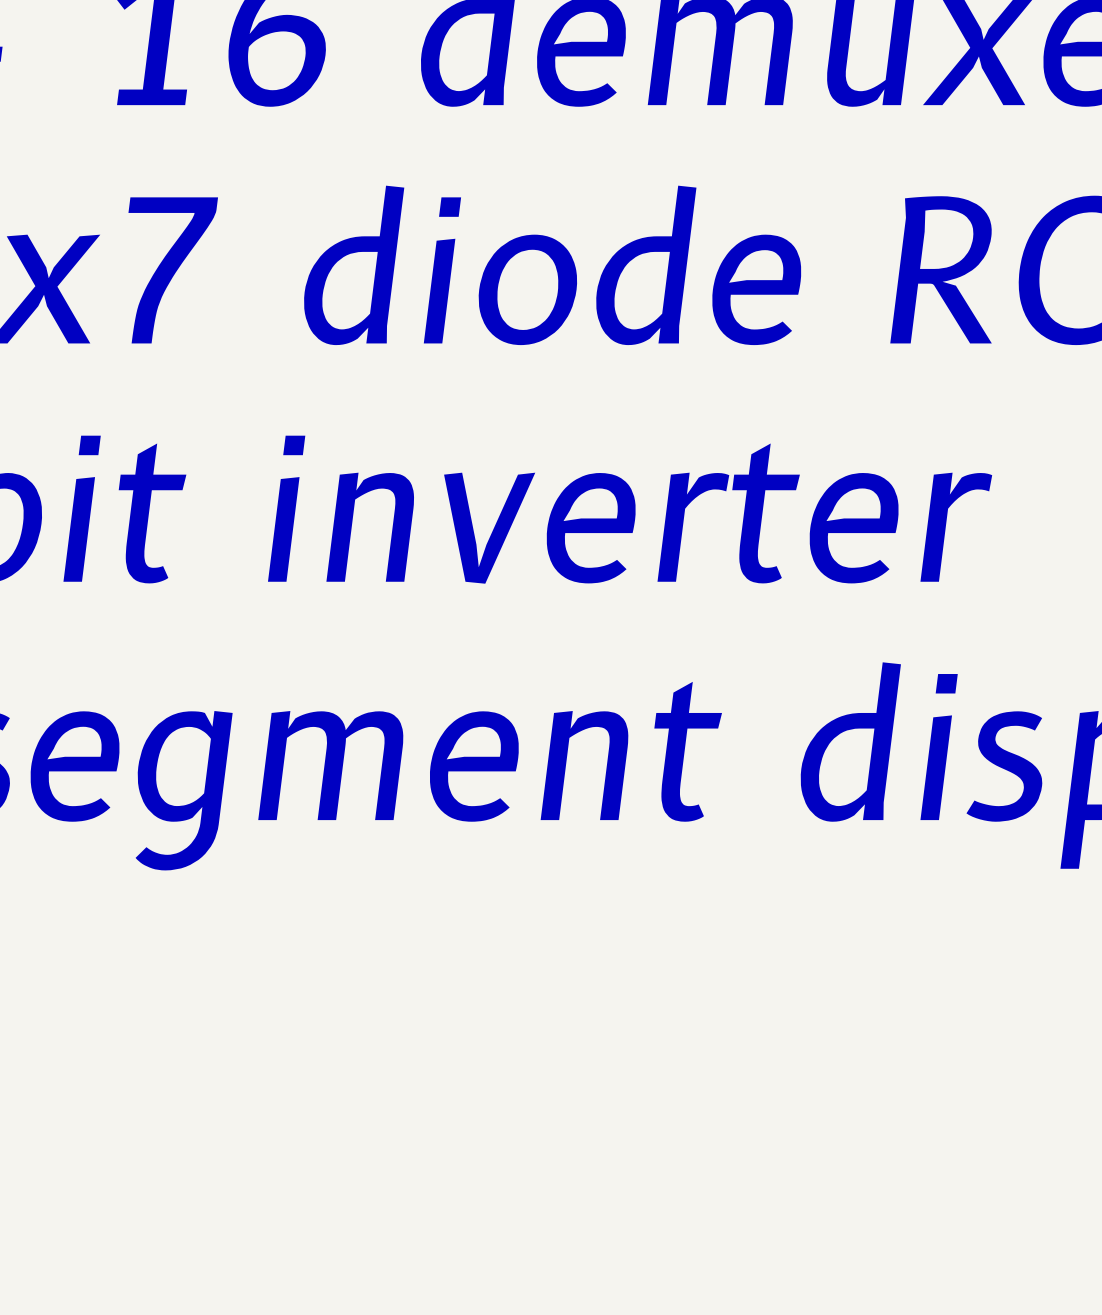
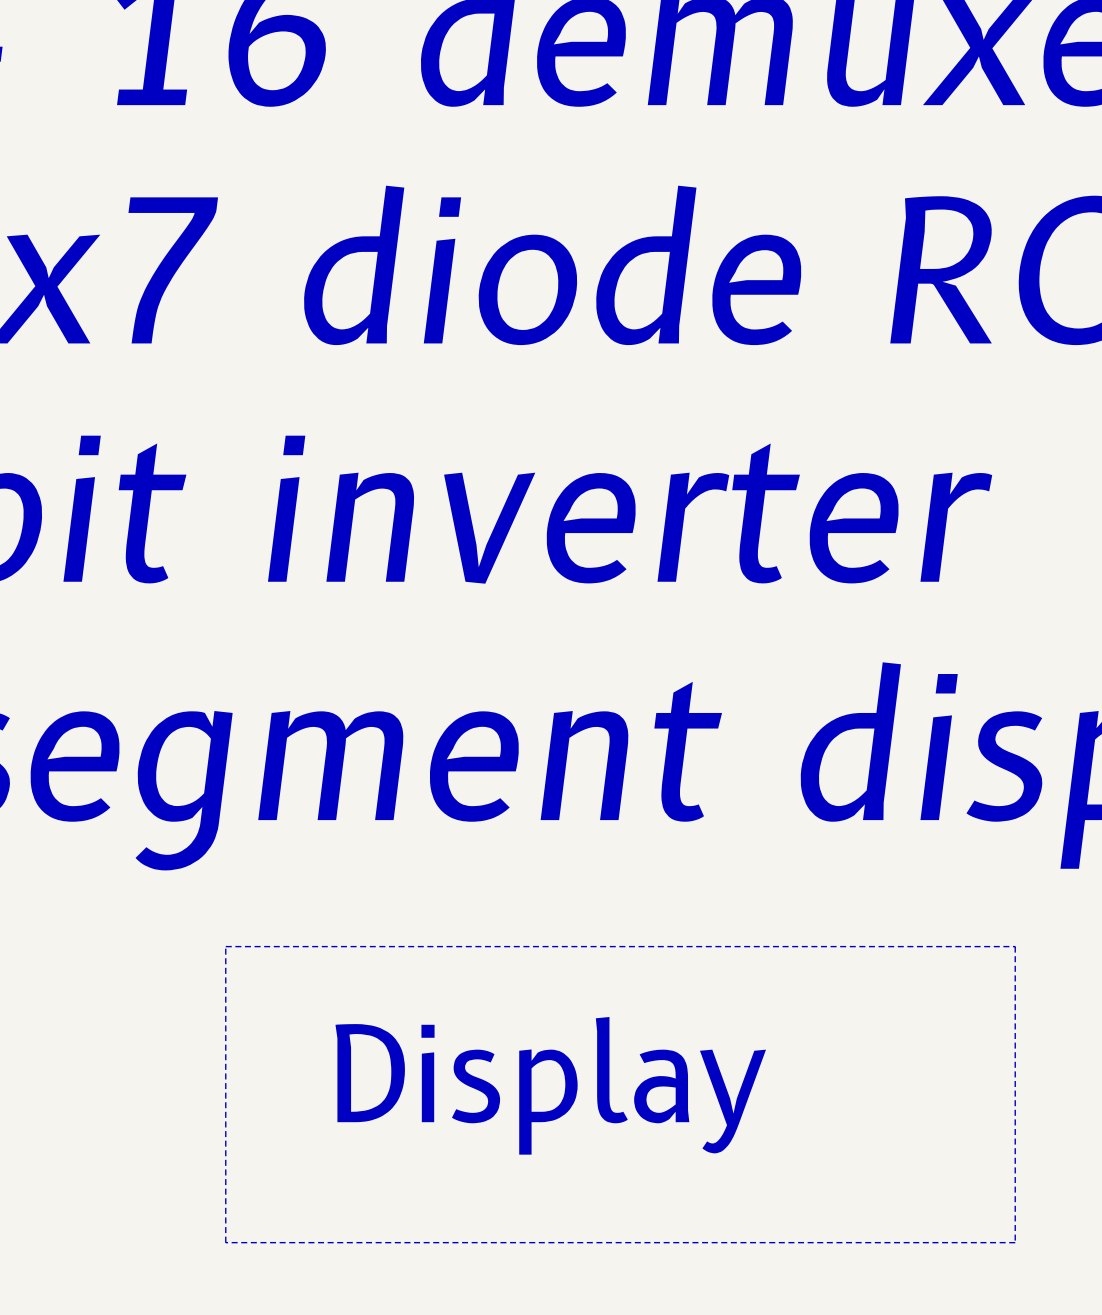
line: none -> (225, 946) (225, 1242) (1015, 1242) (1015, 946) (225, 946)
text: none -> Display (550, 1085)

